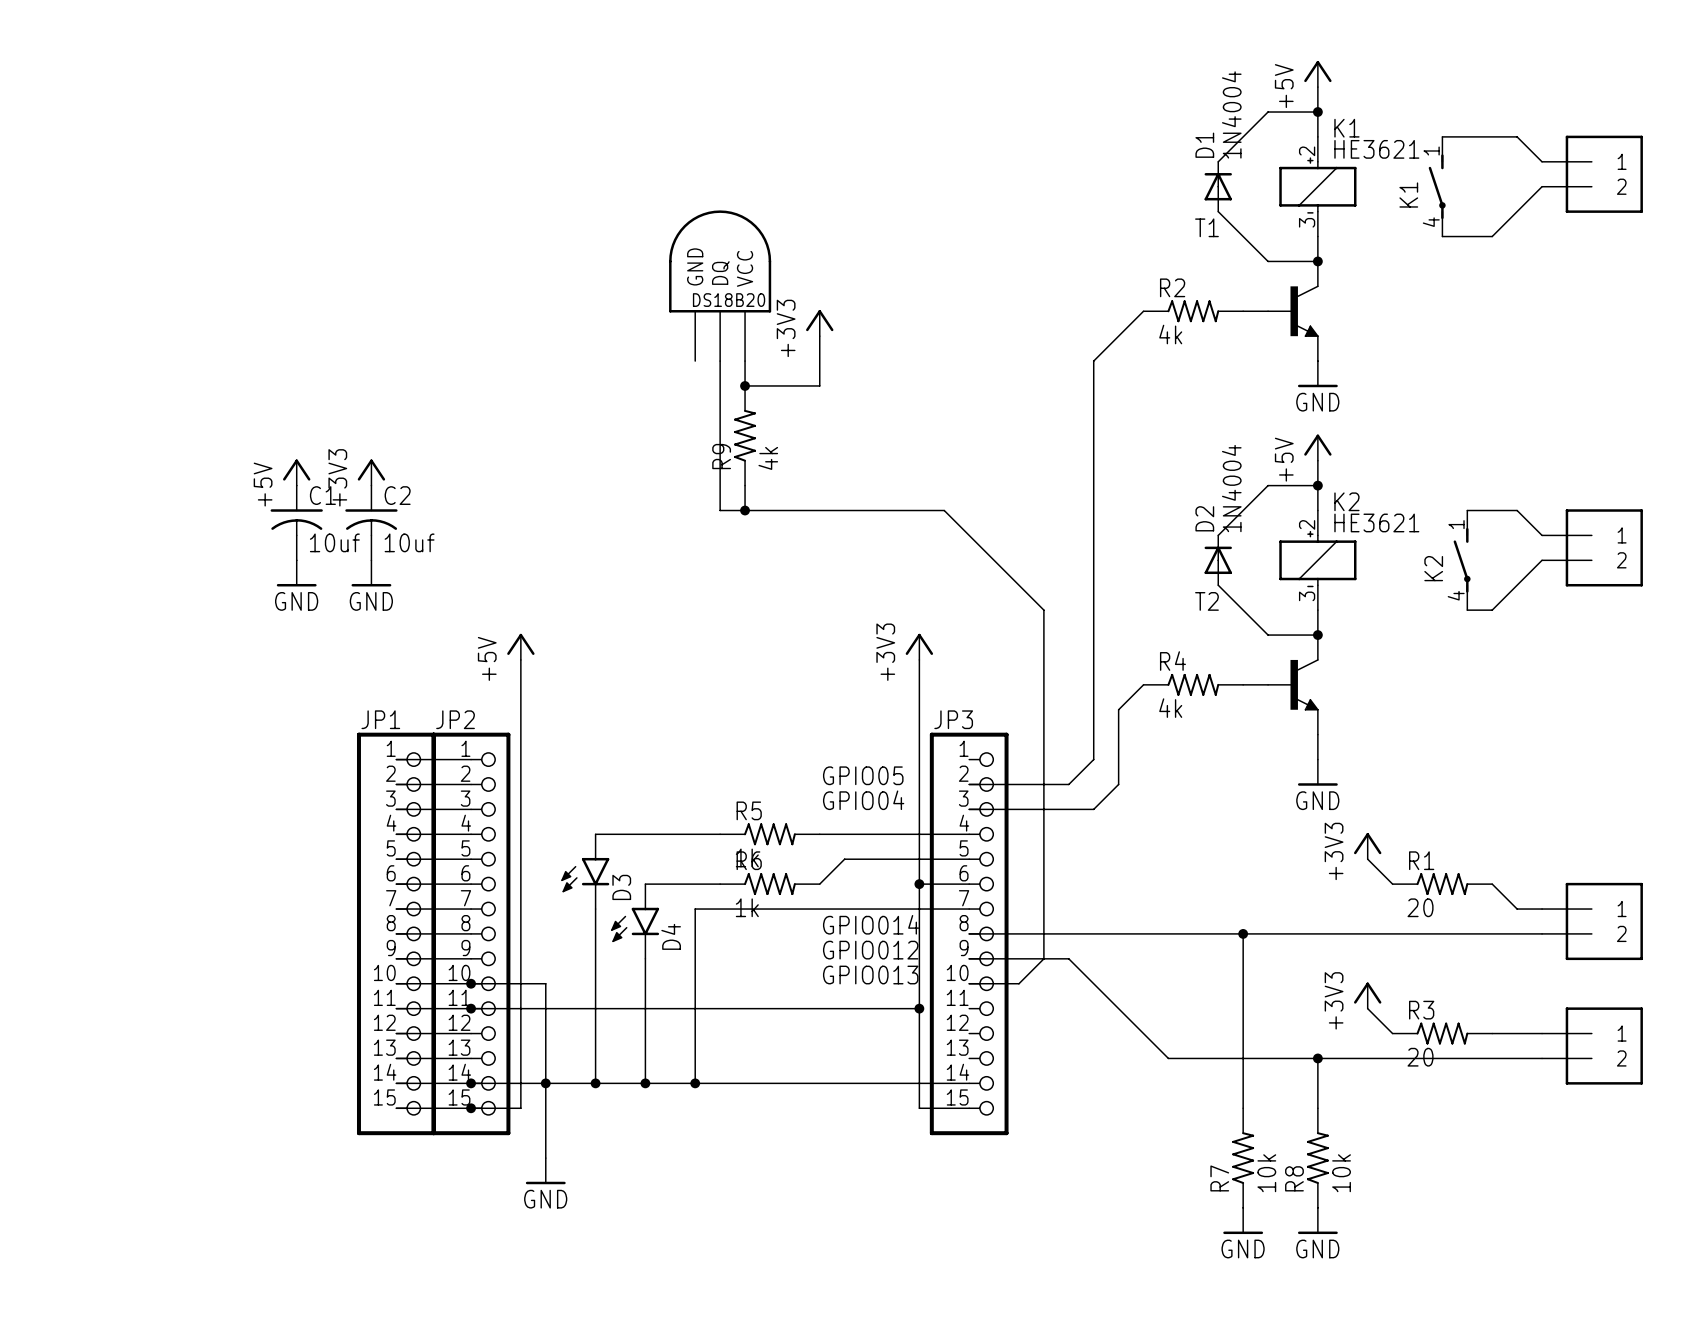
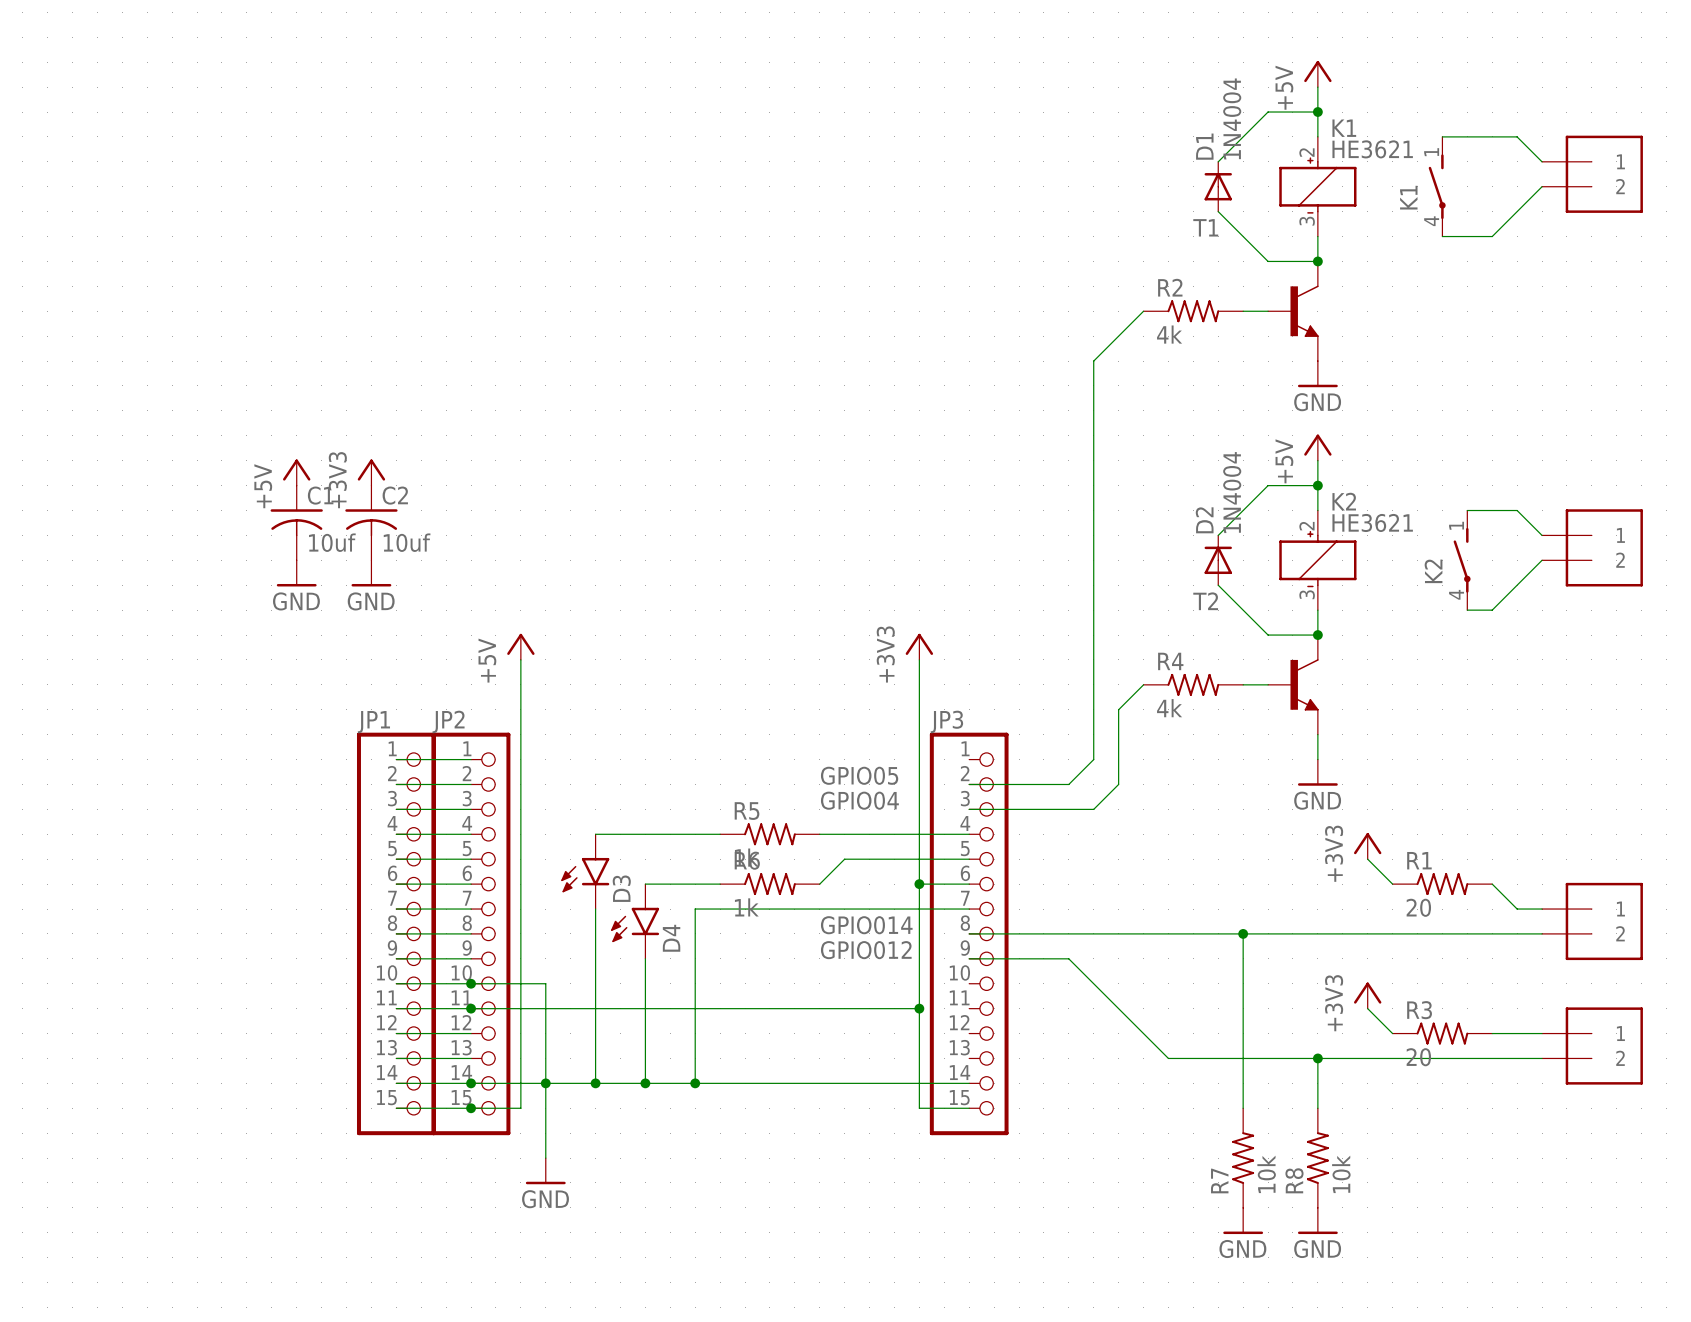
part: (720, 285) -> none
power symbol: +3V3 (819, 323) -> none
wire: (819, 336) (819, 385) (745, 385) (745, 361) -> none
wire: (720, 361) (720, 510) (944, 510) (1043, 610) (1043, 958) (1019, 983) (969, 983) -> none
junction: (745, 385) -> none
R9: 4k (745, 435) -> none
wire: (745, 485) (745, 510) -> none
junction: (745, 510) -> none
text: GPIO013 (870, 975) -> none

